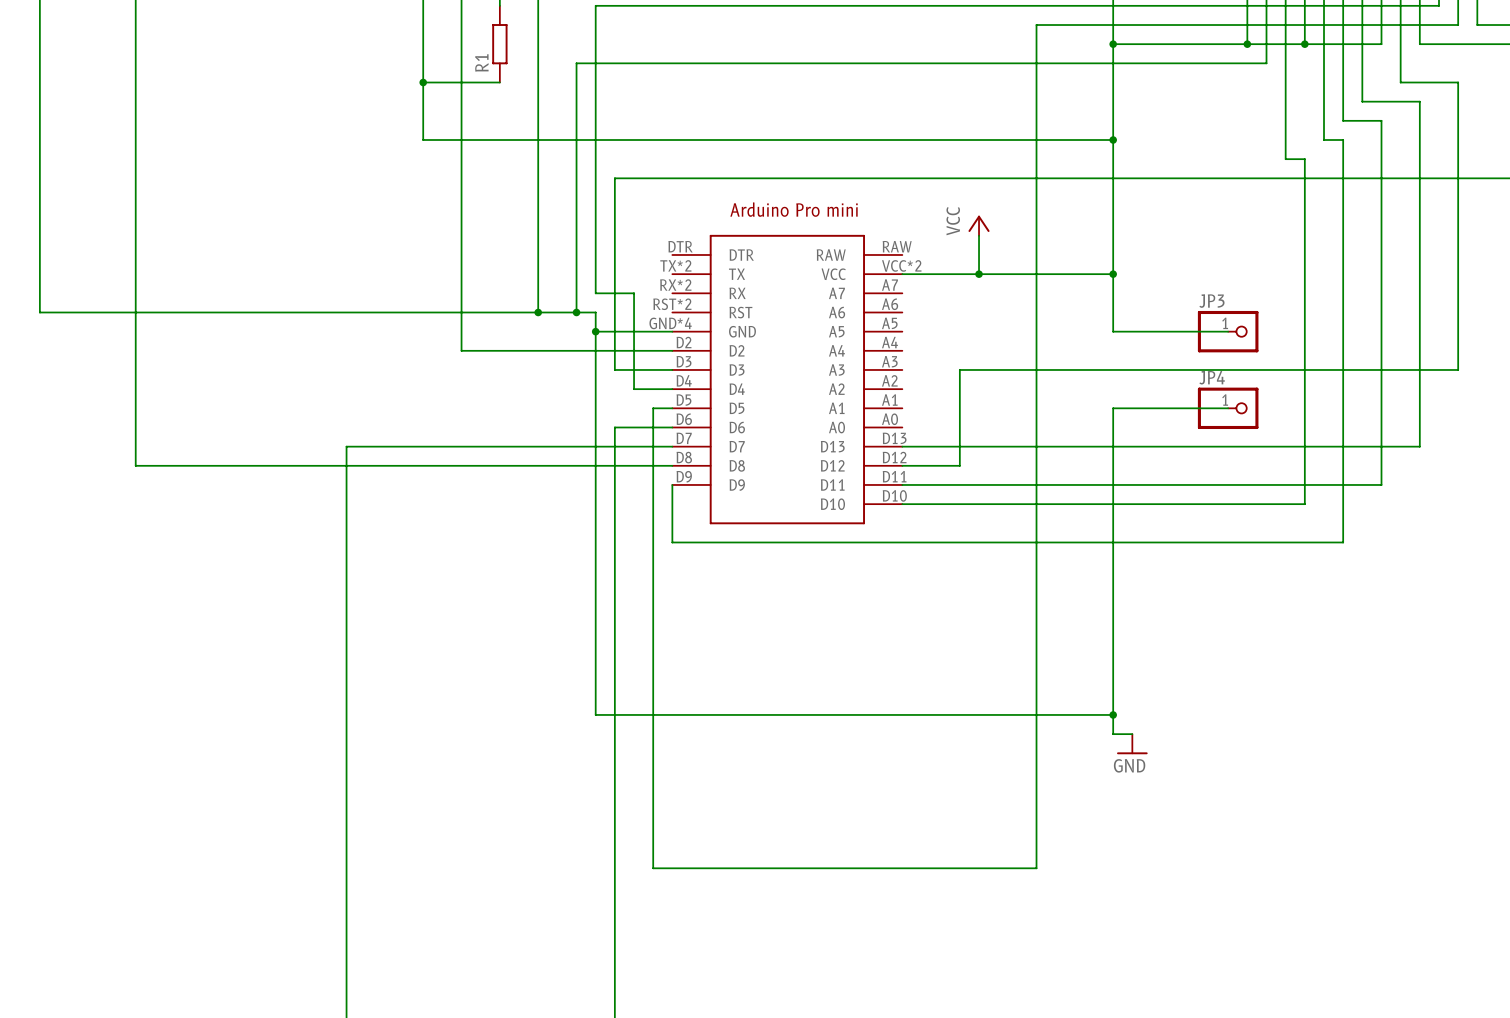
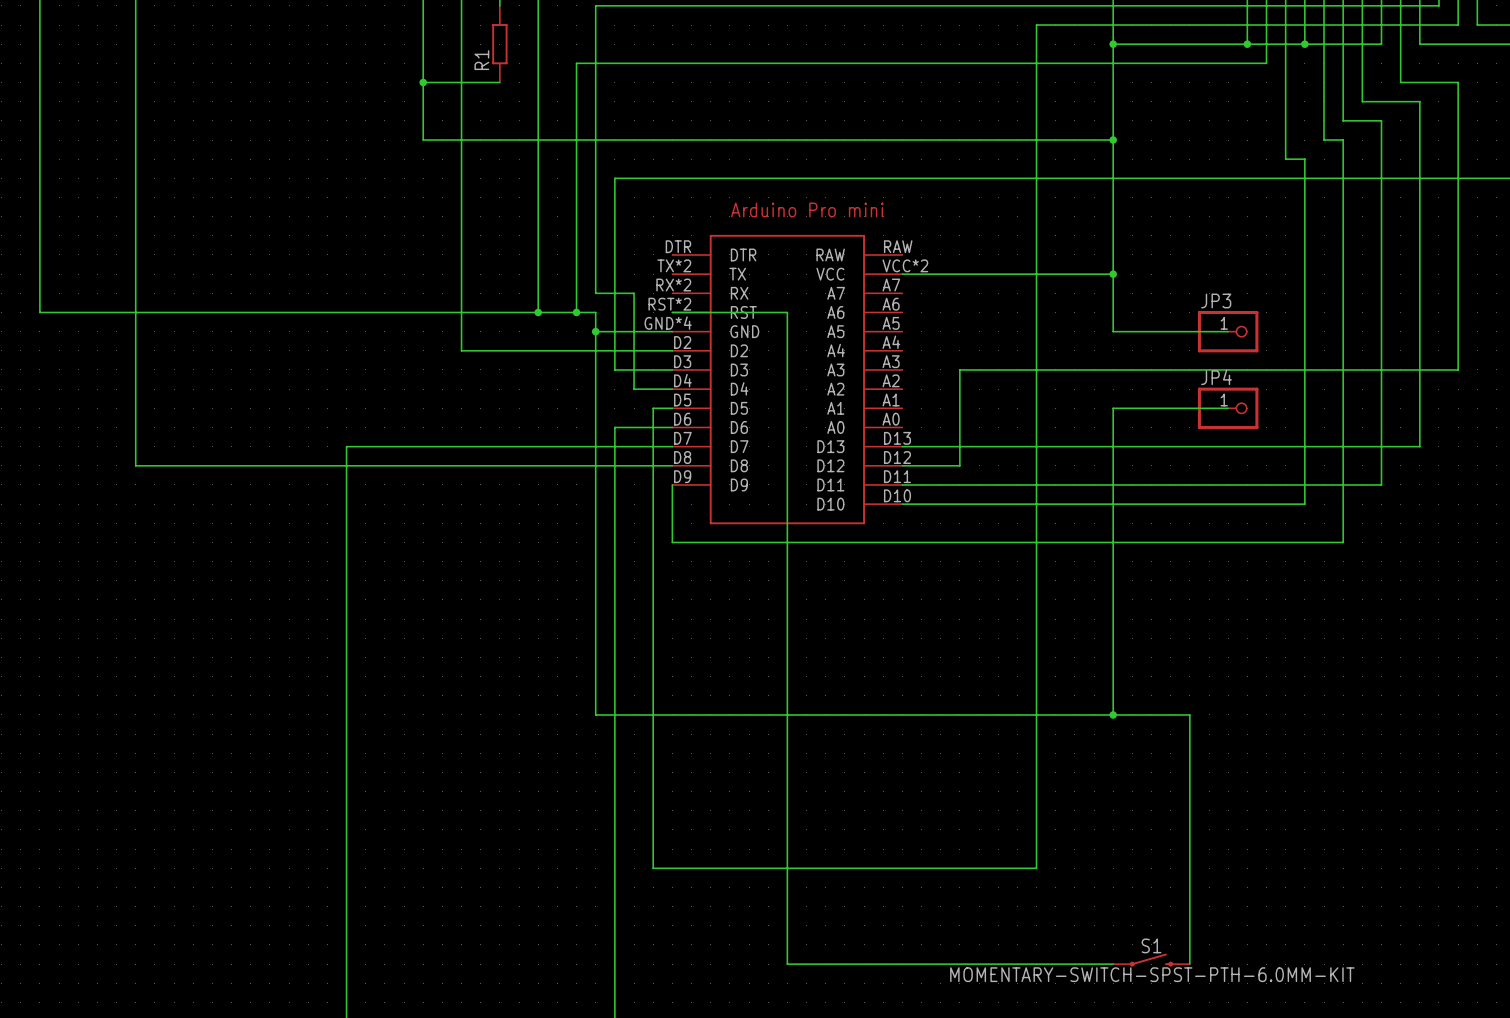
power symbol: VCC (979, 225) -> none
wire: (979, 235) (979, 274) -> none
junction: (979, 274) -> none
wire: none -> (672, 312) (787, 312) (787, 964) (1113, 964)
wire: (1113, 714) (1113, 734) (1132, 734) -> (1113, 714) (1189, 714) (1189, 964)
power symbol: GND (1132, 744) -> none
S1: none -> MOMENTARY-SWITCH-SPST-PTH-6.0MM-KIT (1151, 960)

